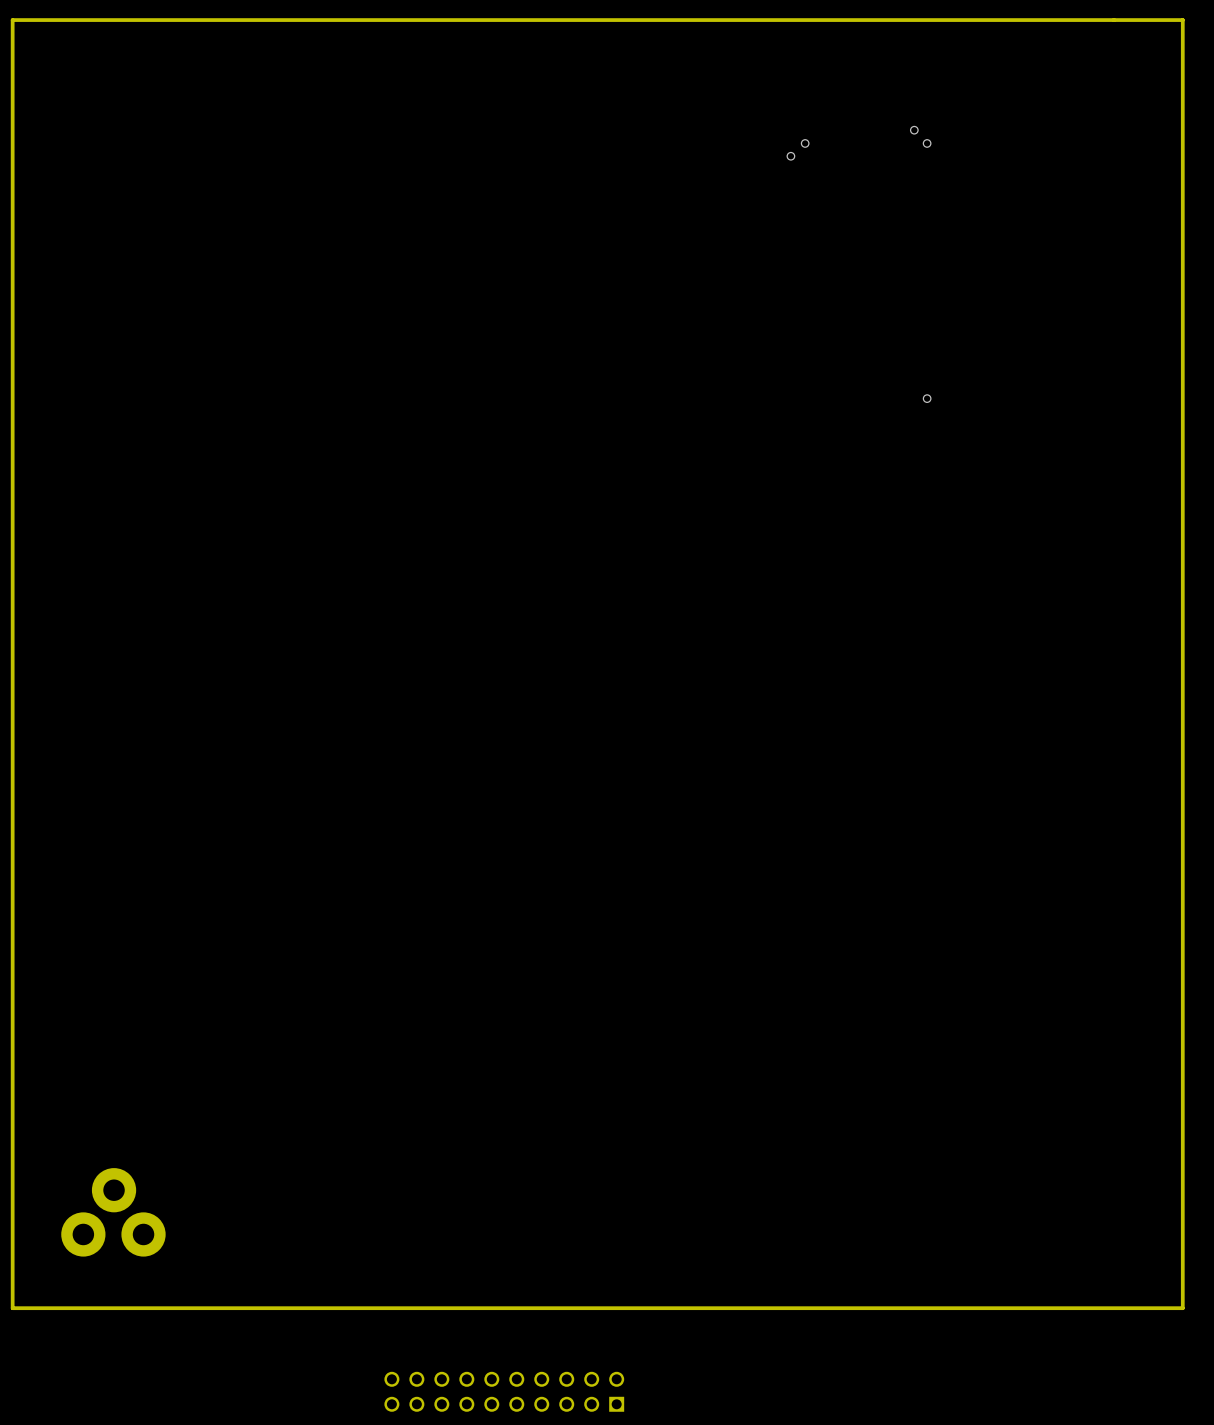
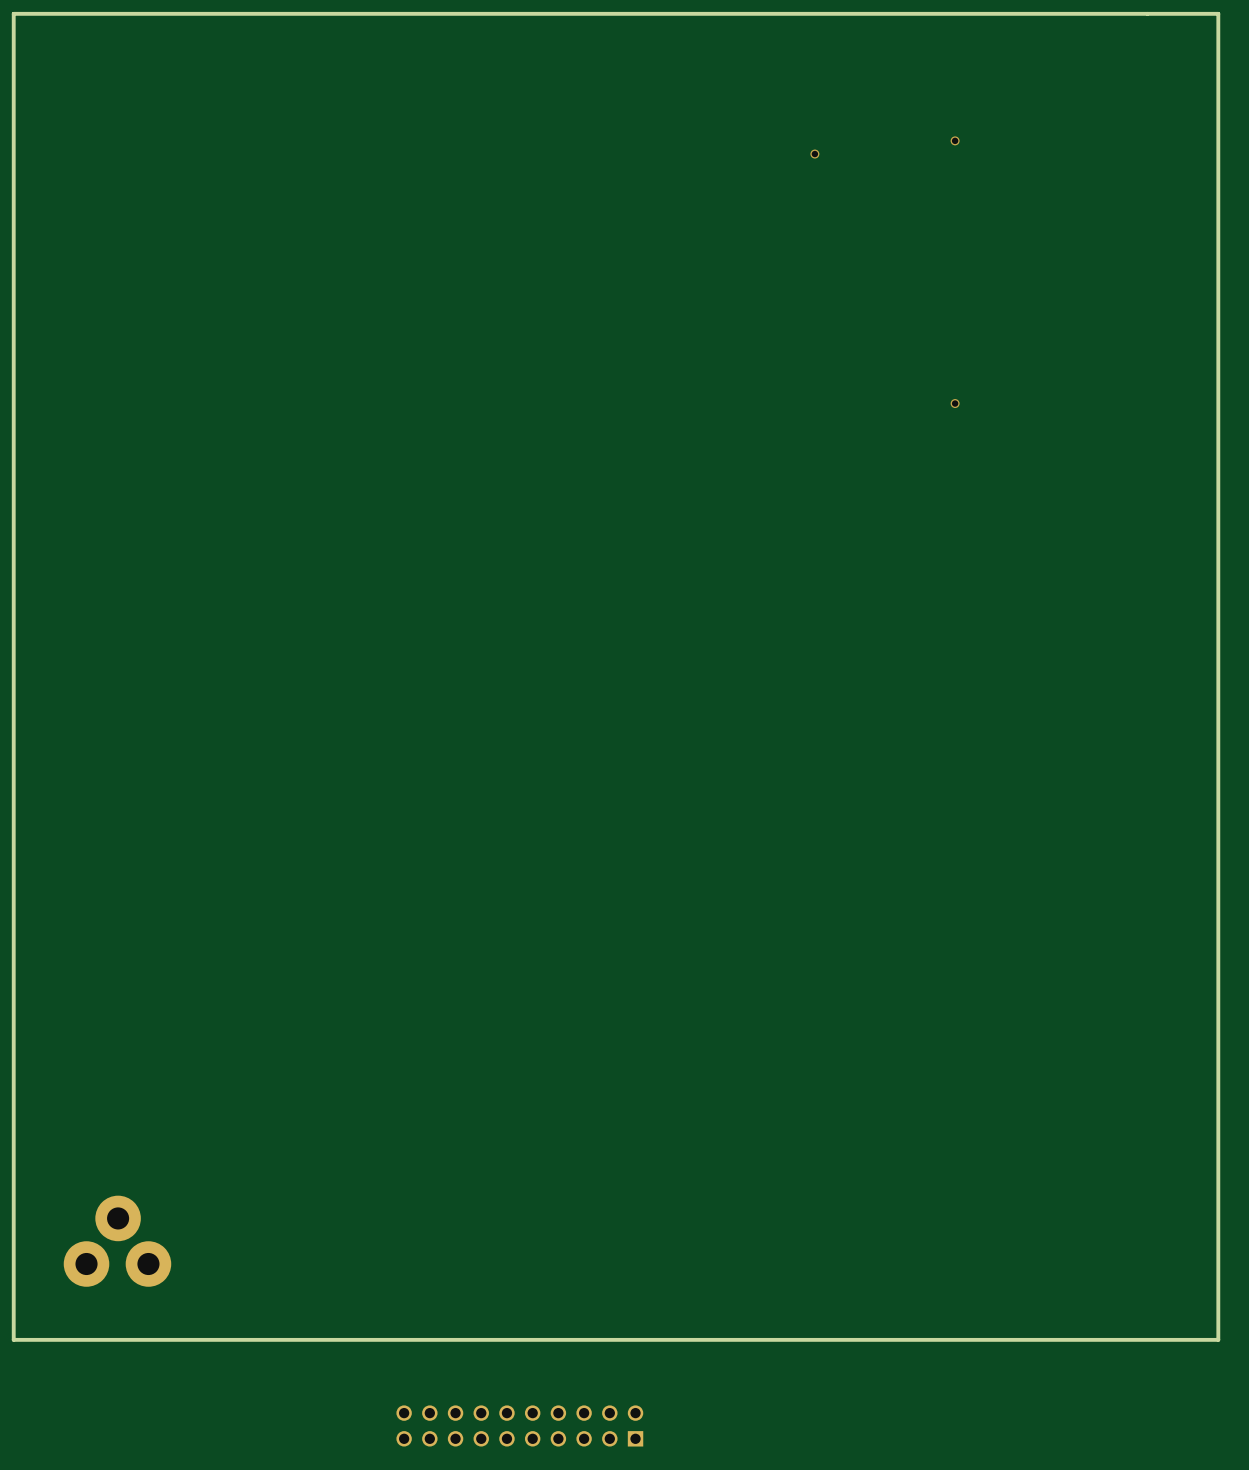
via: (914, 130) -> none
via: (805, 143) -> none

